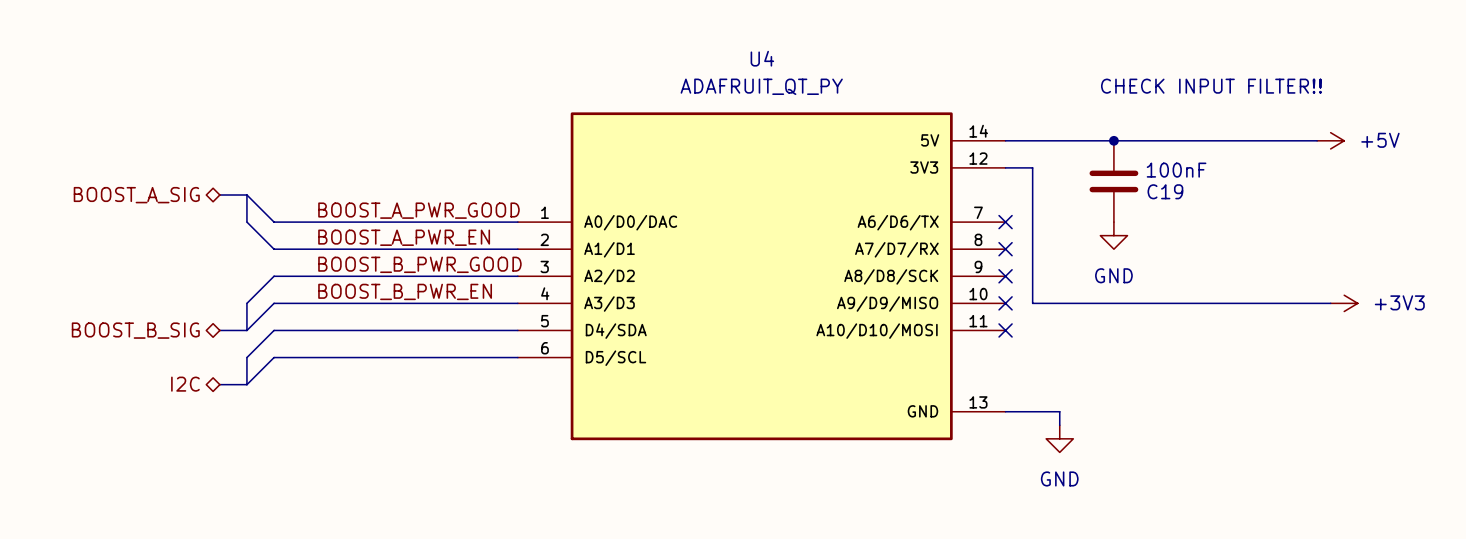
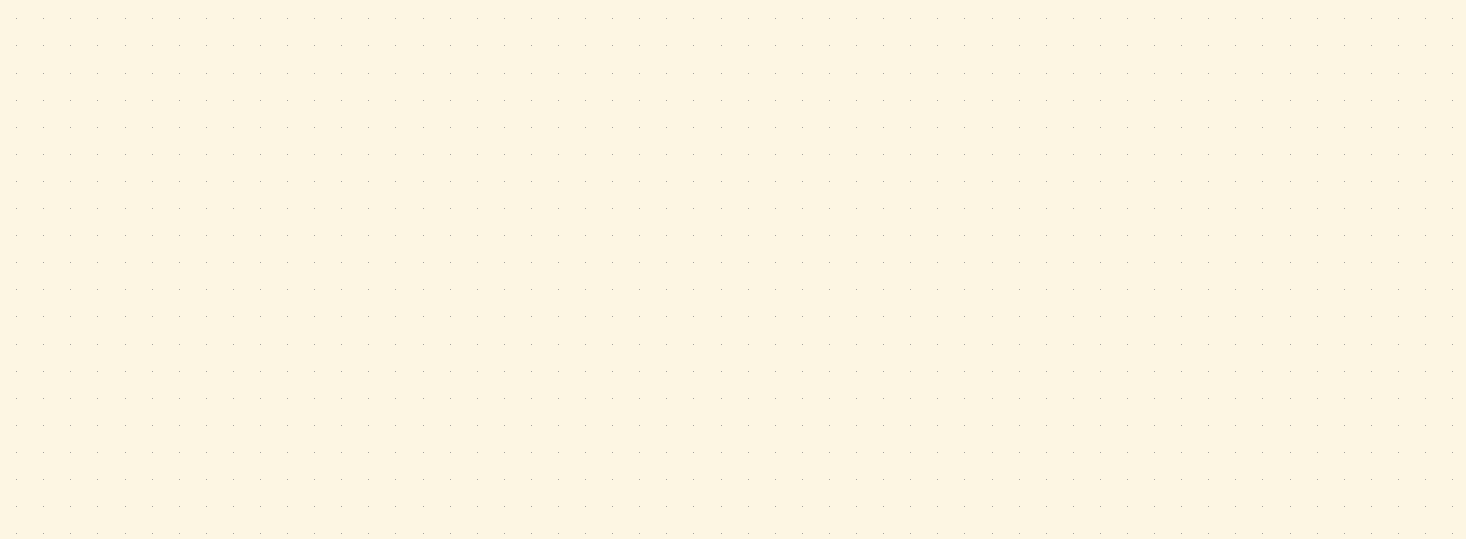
text: CHECK INPUT FILTER!! (1211, 86) -> none
wire: (1005, 140) (1317, 140) -> none
junction: (1113, 140) -> none
power symbol: +5V (1330, 140) -> none
wire: (1005, 167) (1032, 167) (1032, 303) (1330, 303) -> none
C19: 100nF (1113, 181) -> none
hierarchical label: BOOST_A_SIG (136, 195) -> none
bus: (219, 195) (246, 195) (246, 222) -> none
wire: (246, 195) (274, 222) (517, 222) -> none
label: BOOST_A_PWR_GOOD (418, 210) -> none
wire: (246, 222) (274, 249) (517, 249) -> none
no-connect mark: (1005, 222) -> none
power symbol: GND (1113, 235) -> none
label: BOOST_A_PWR_EN (404, 237) -> none
no-connect mark: (1005, 249) -> none
label: BOOST_B_PWR_GOOD (419, 264) -> none
wire: (517, 276) (274, 276) (246, 303) -> none
U4: ADAFRUIT_QT_PY (761, 276) -> none
no-connect mark: (1005, 276) -> none
label: BOOST_B_PWR_EN (405, 291) -> none
bus: (246, 303) (246, 330) (219, 330) -> none
wire: (517, 303) (274, 303) (246, 330) -> none
no-connect mark: (1005, 303) -> none
power symbol: +3V3 (1344, 303) -> none
hierarchical label: BOOST_B_SIG (135, 330) -> none
wire: (517, 330) (274, 330) (246, 357) -> none
no-connect mark: (1005, 330) -> none
bus: (246, 357) (246, 384) (219, 384) -> none
wire: (517, 357) (274, 357) (246, 384) -> none
hierarchical label: I2C (185, 384) -> none
wire: (1005, 411) (1059, 411) (1059, 425) -> none
power symbol: GND (1059, 438) -> none

